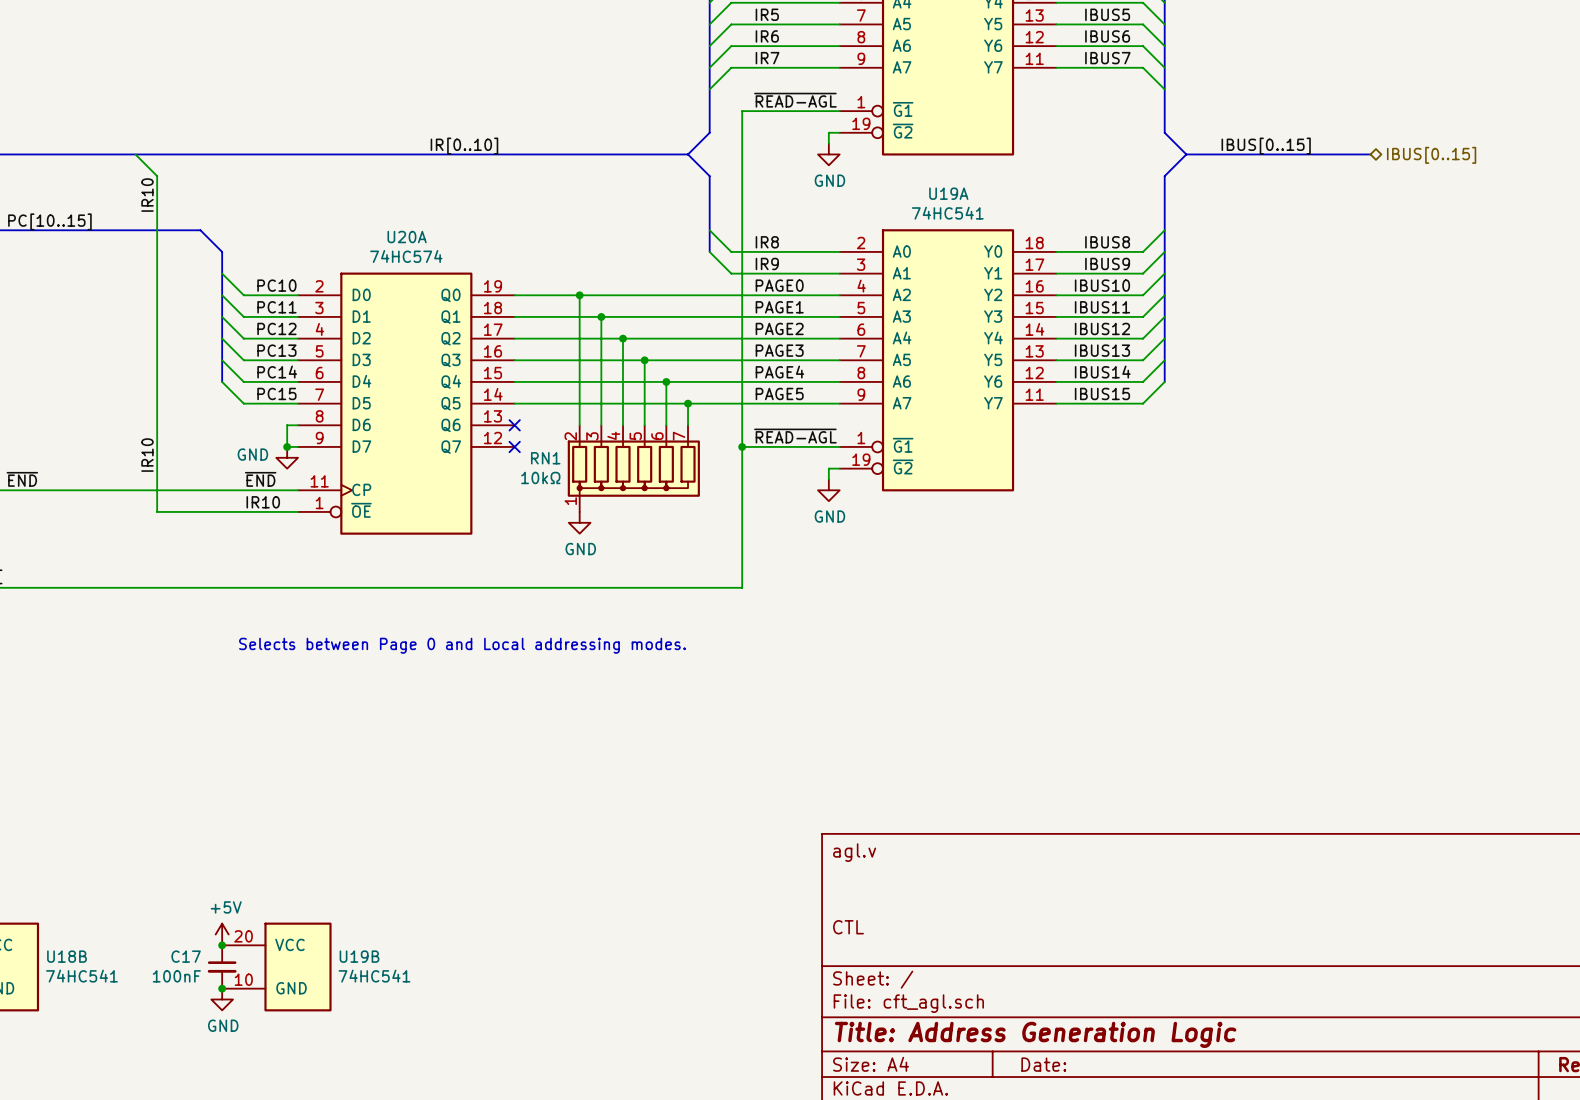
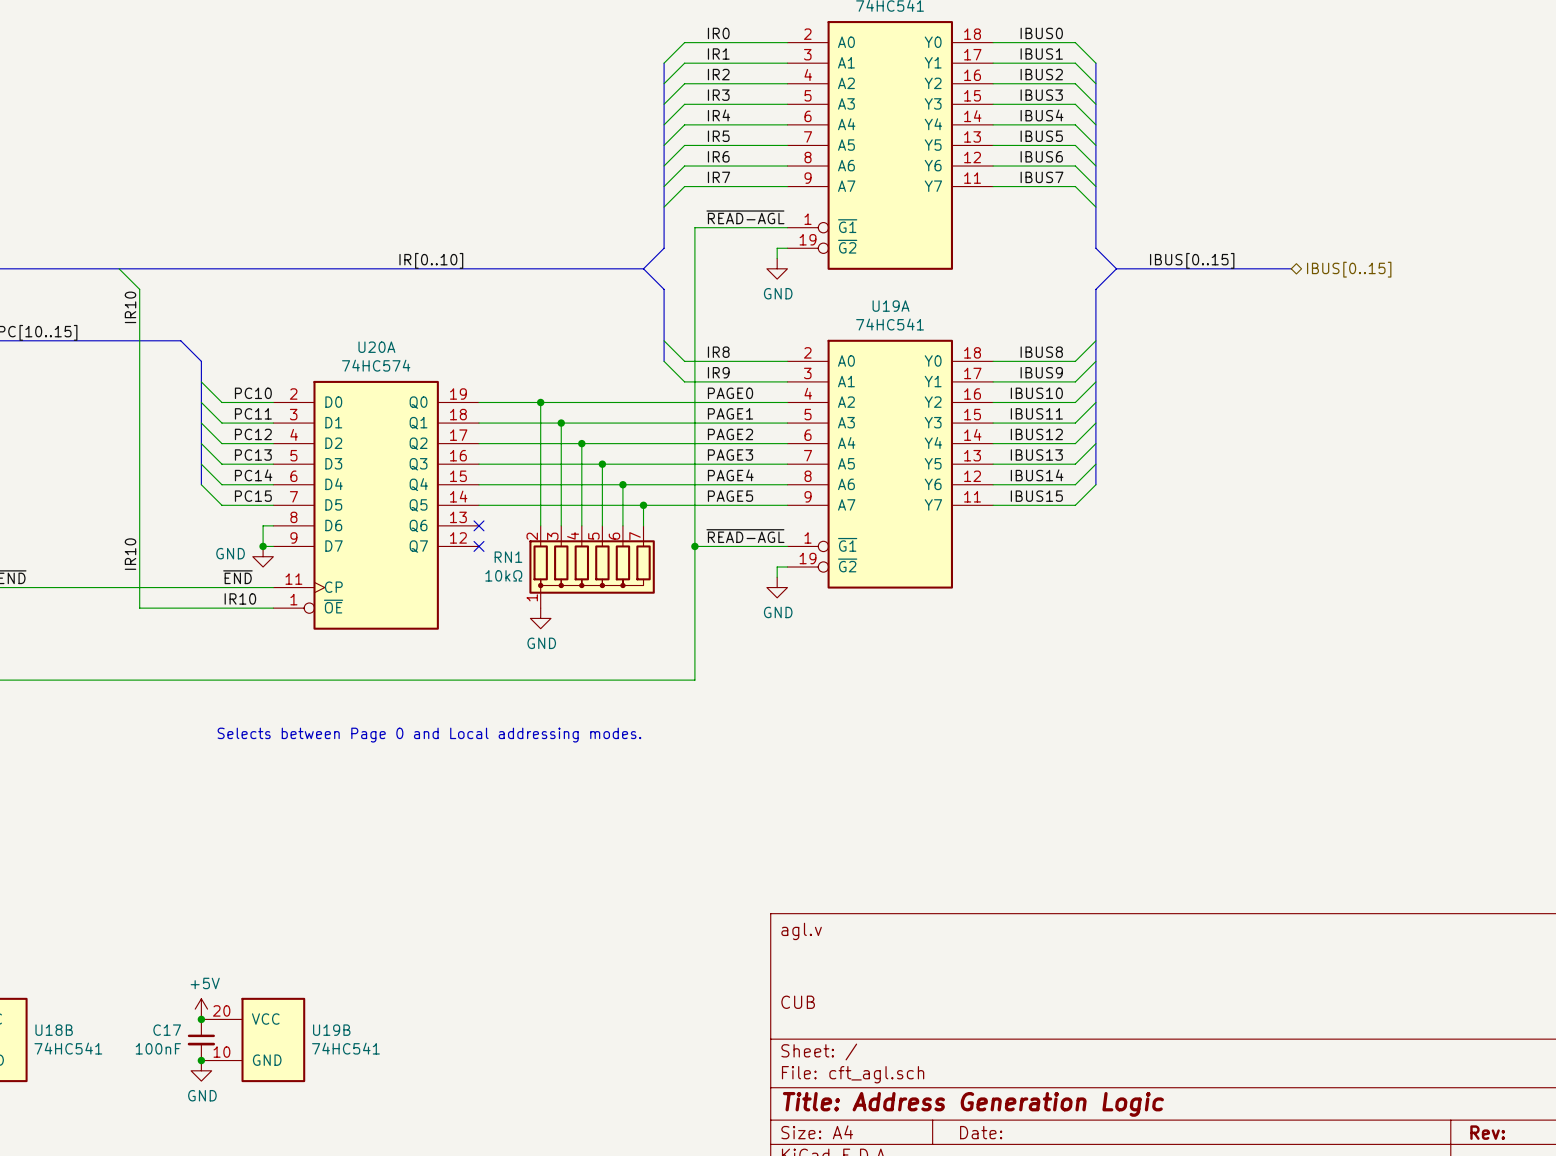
title block: CTL (848, 927) -> CUB (798, 1002)

